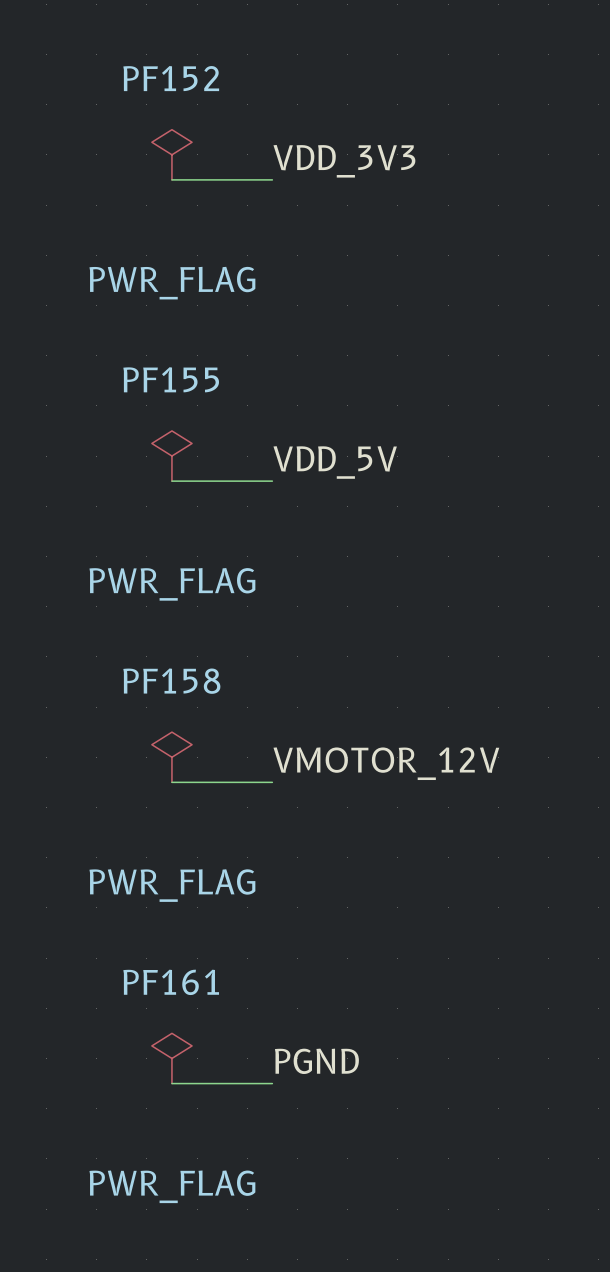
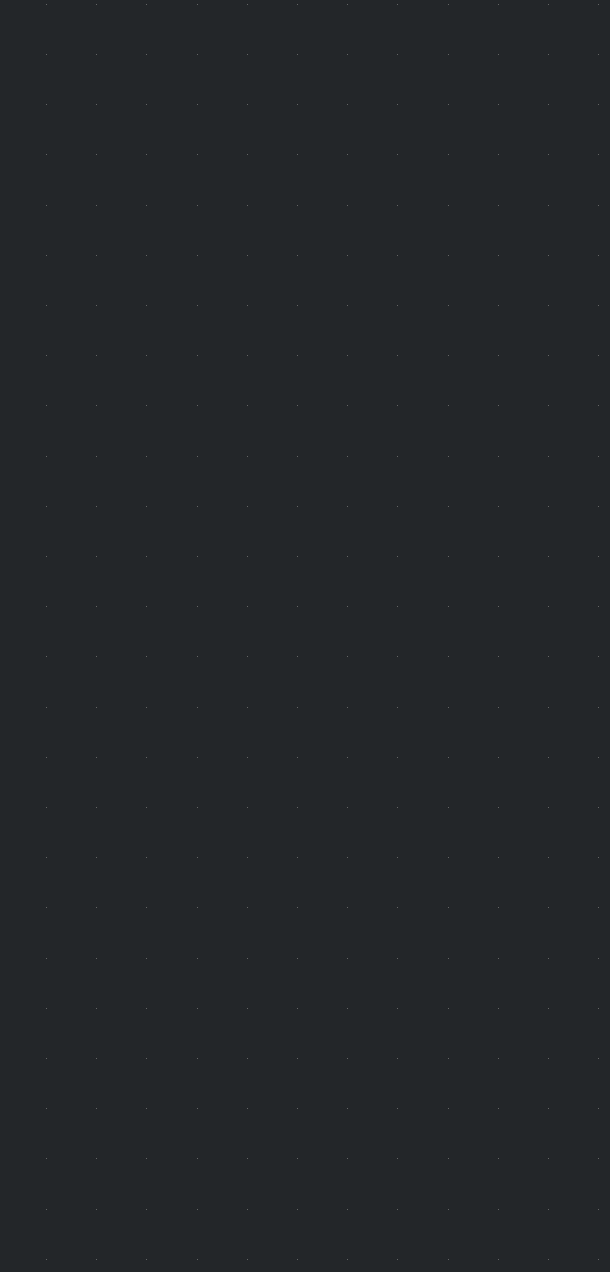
PF152: PWR_FLAG (171, 154) -> none
label: VDD_3V3 (344, 161) -> none
wire: (171, 179) (272, 179) -> none
PF155: PWR_FLAG (171, 456) -> none
label: VDD_5V (335, 462) -> none
wire: (171, 481) (272, 481) -> none
PF158: PWR_FLAG (171, 757) -> none
label: VMOTOR_12V (386, 763) -> none
wire: (171, 782) (272, 782) -> none
PF161: PWR_FLAG (171, 1058) -> none
label: PGND (316, 1061) -> none
wire: (171, 1083) (272, 1083) -> none

